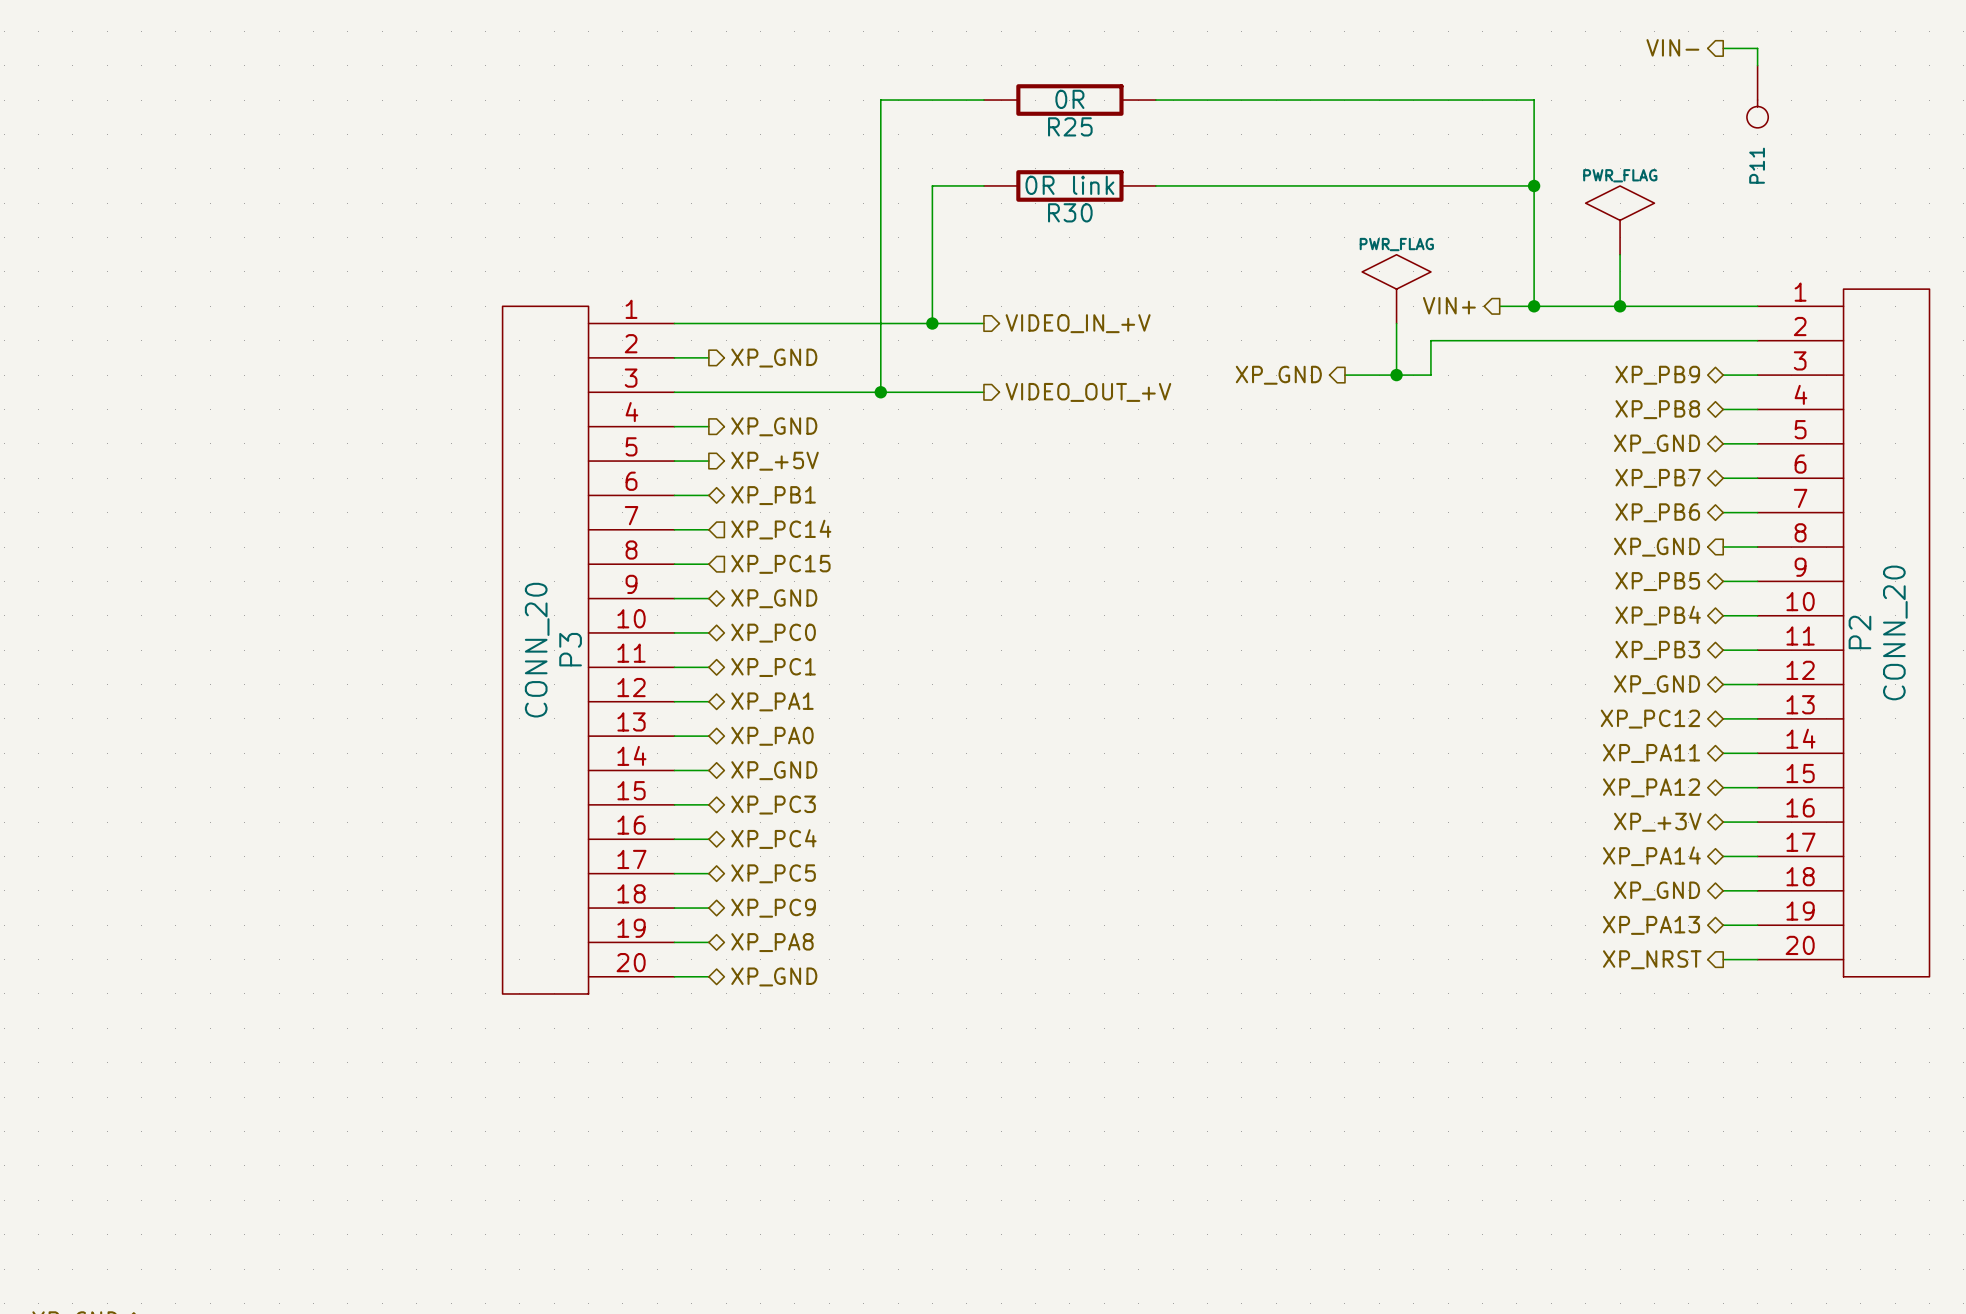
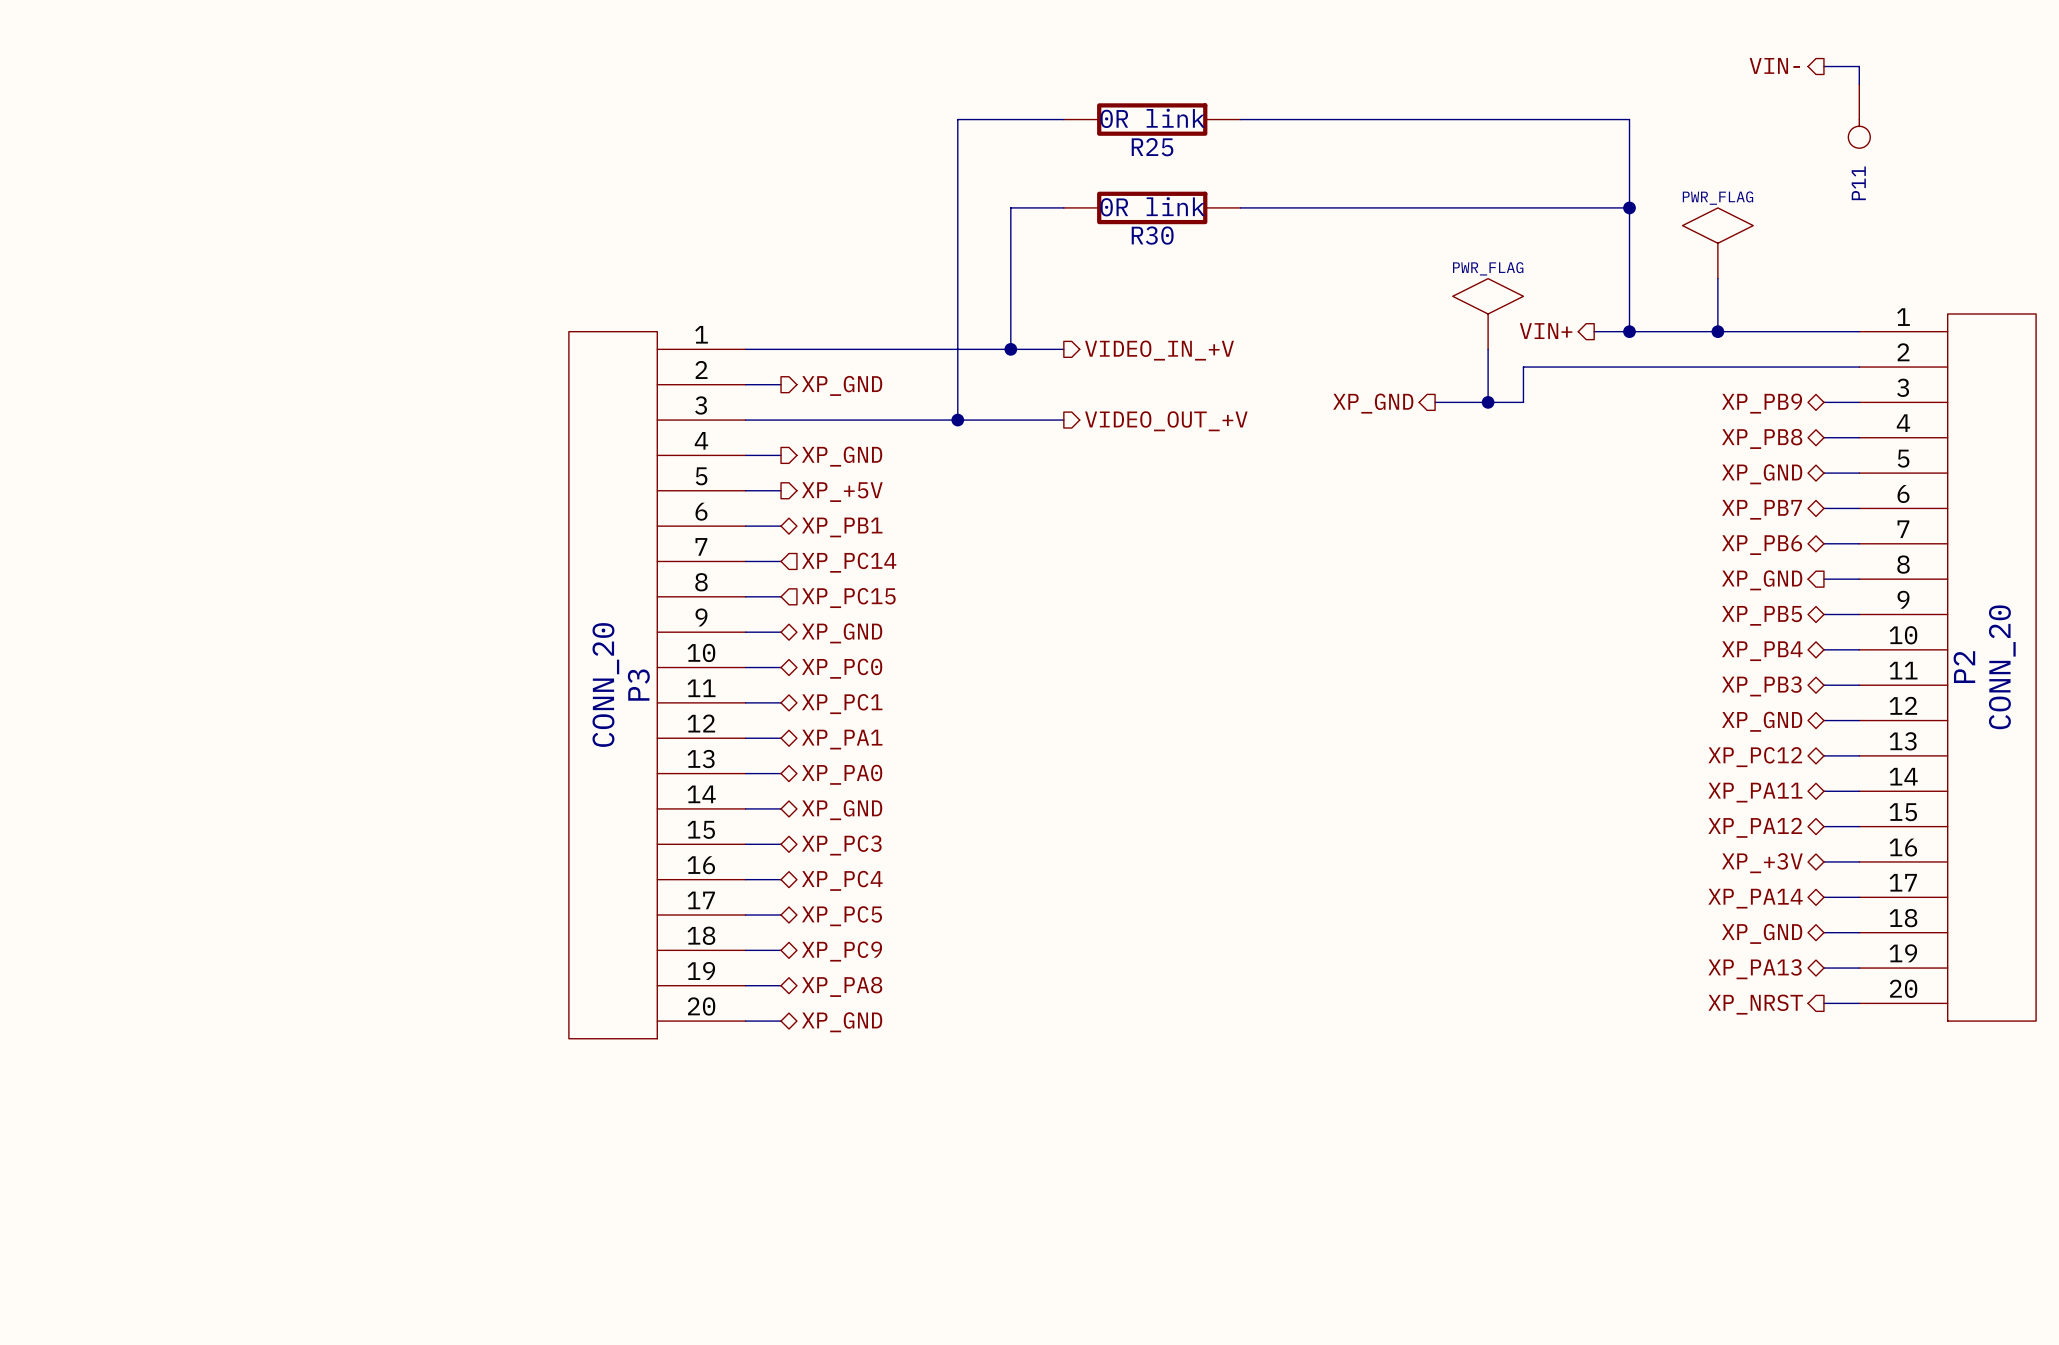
R25 value: 0R (1069, 99) -> 0R link (1152, 118)

